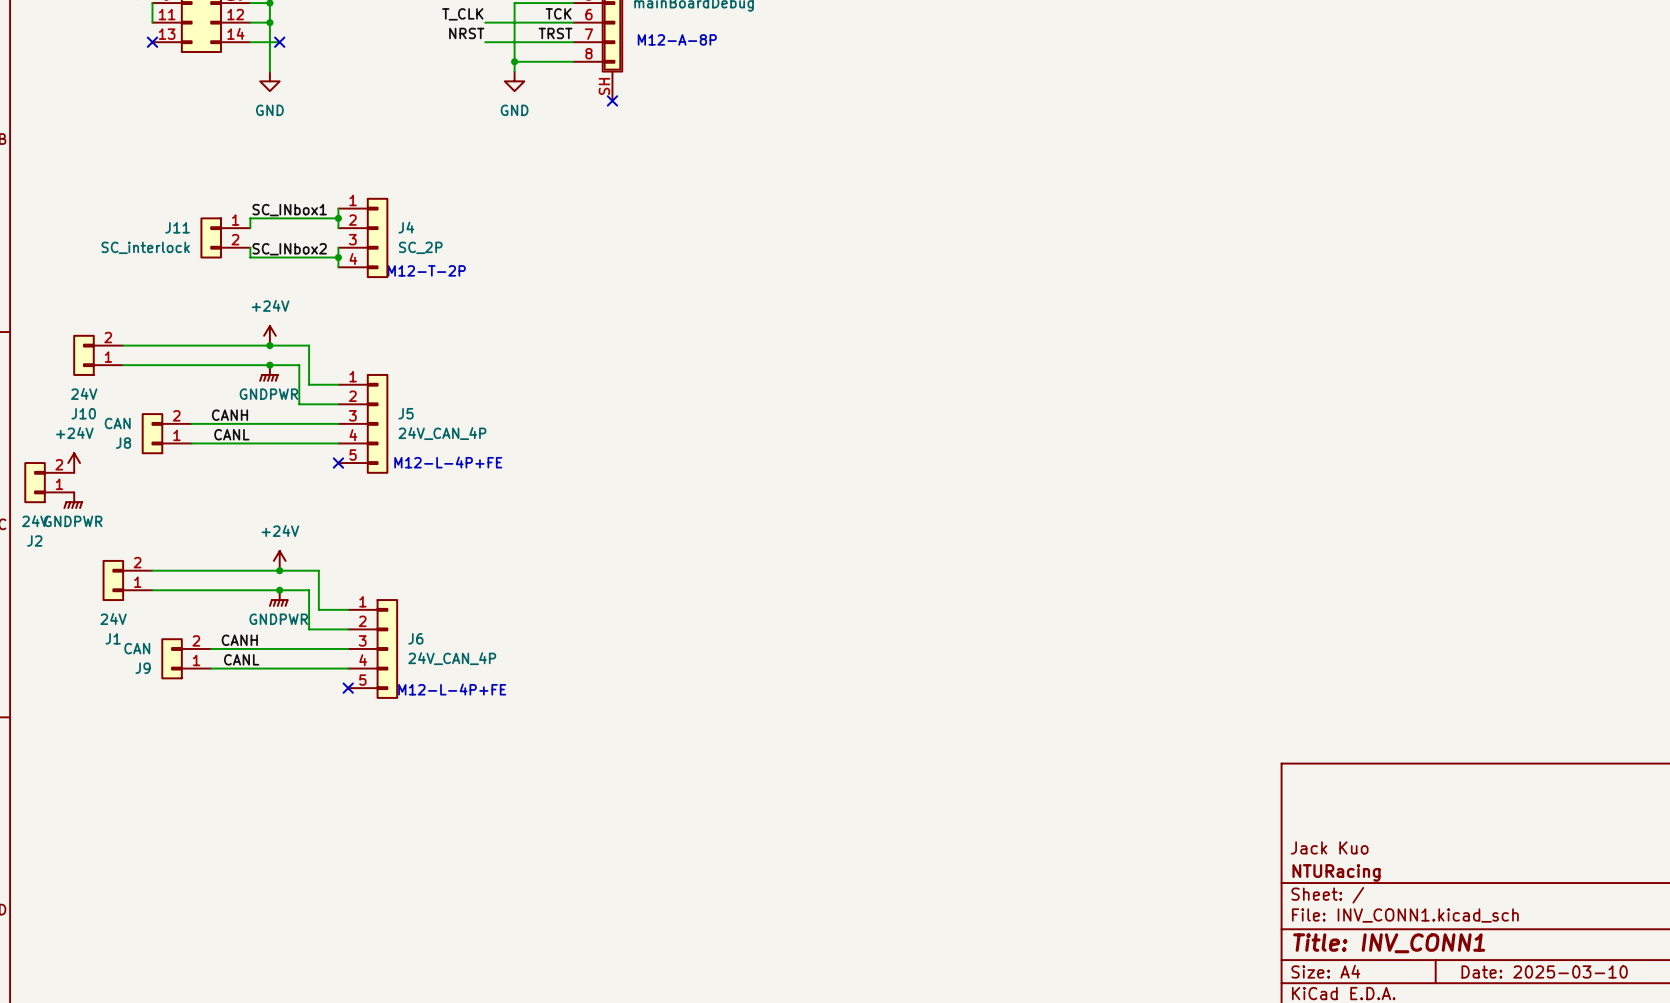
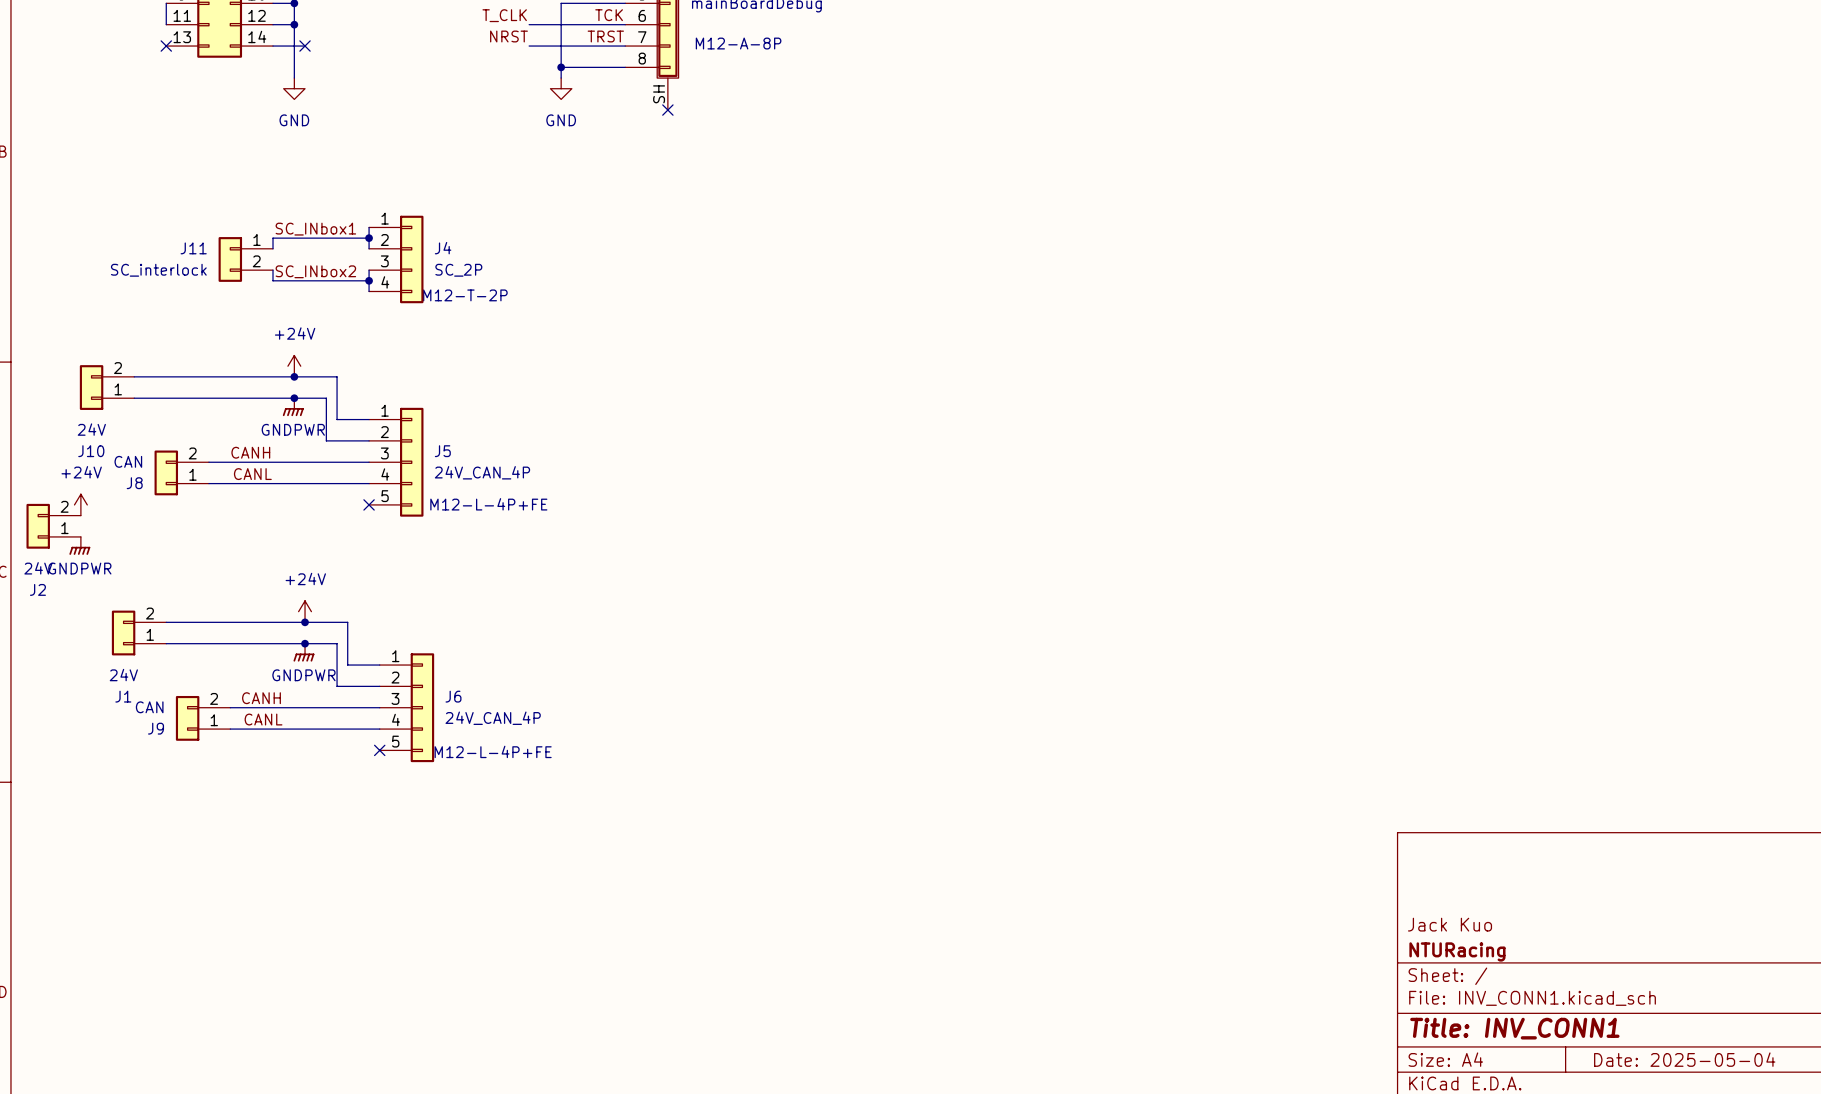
title block: Date: 2025-03-10 (1544, 971) -> Date: 2025-05-04 (1684, 1059)

